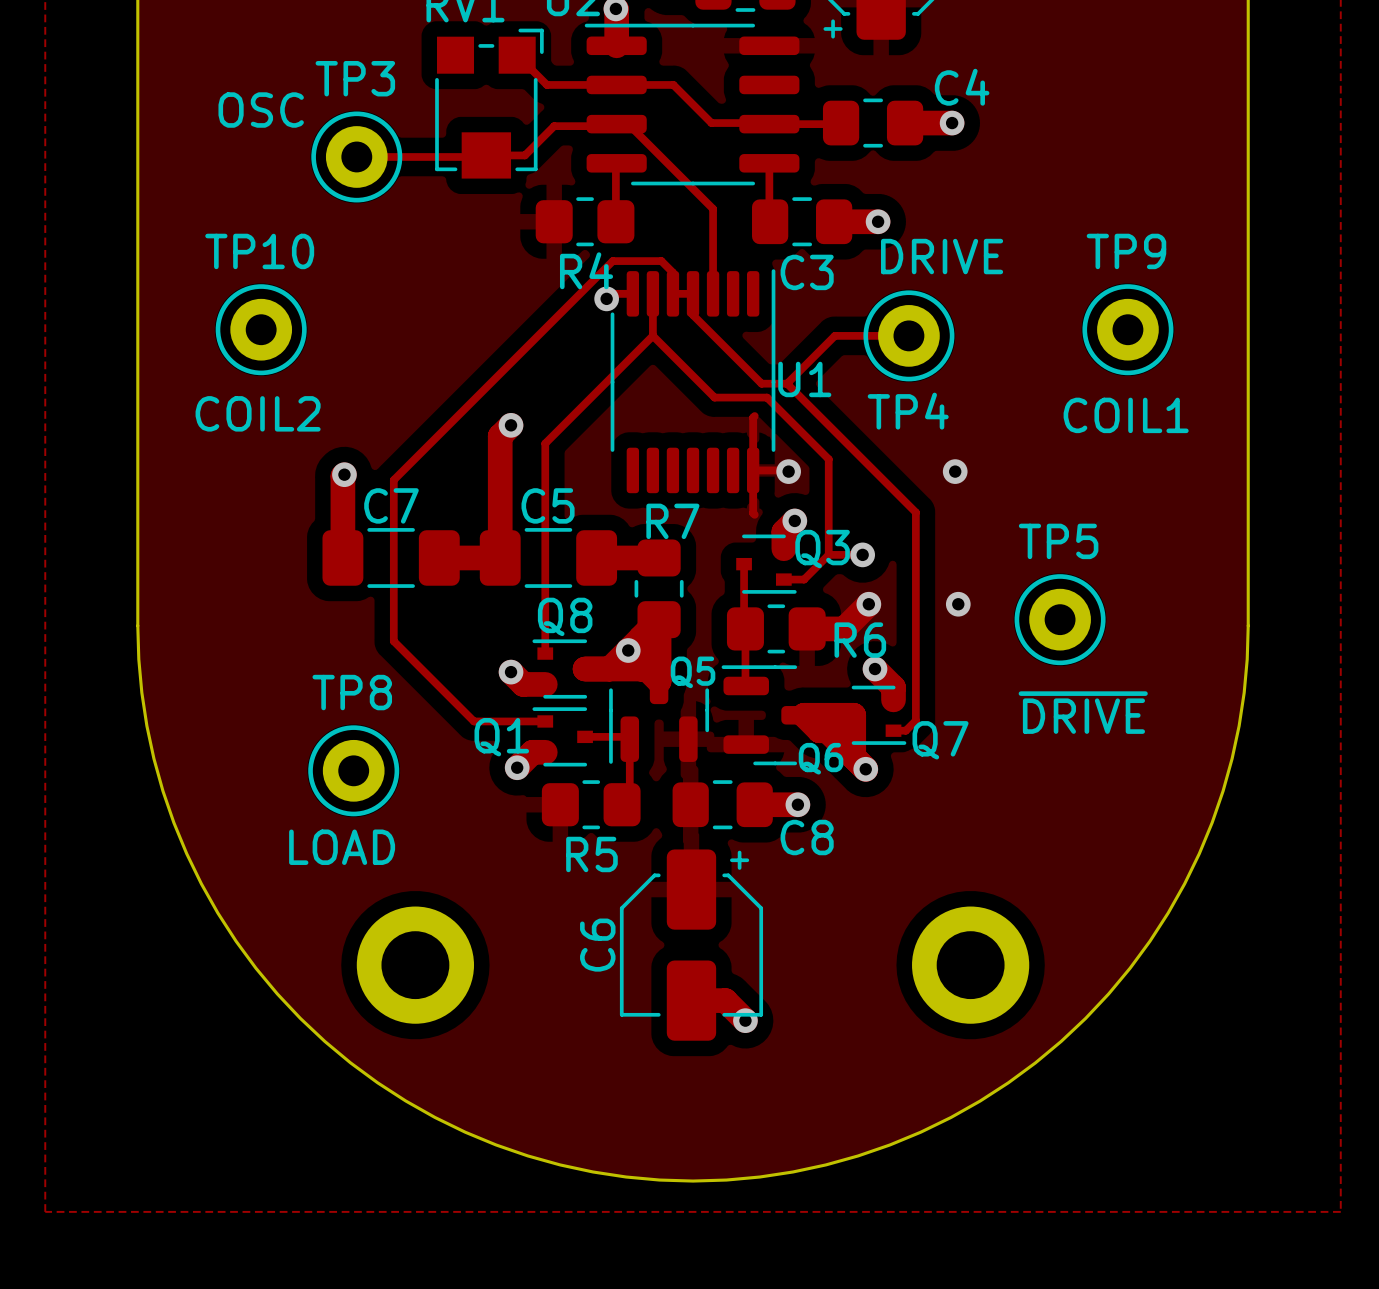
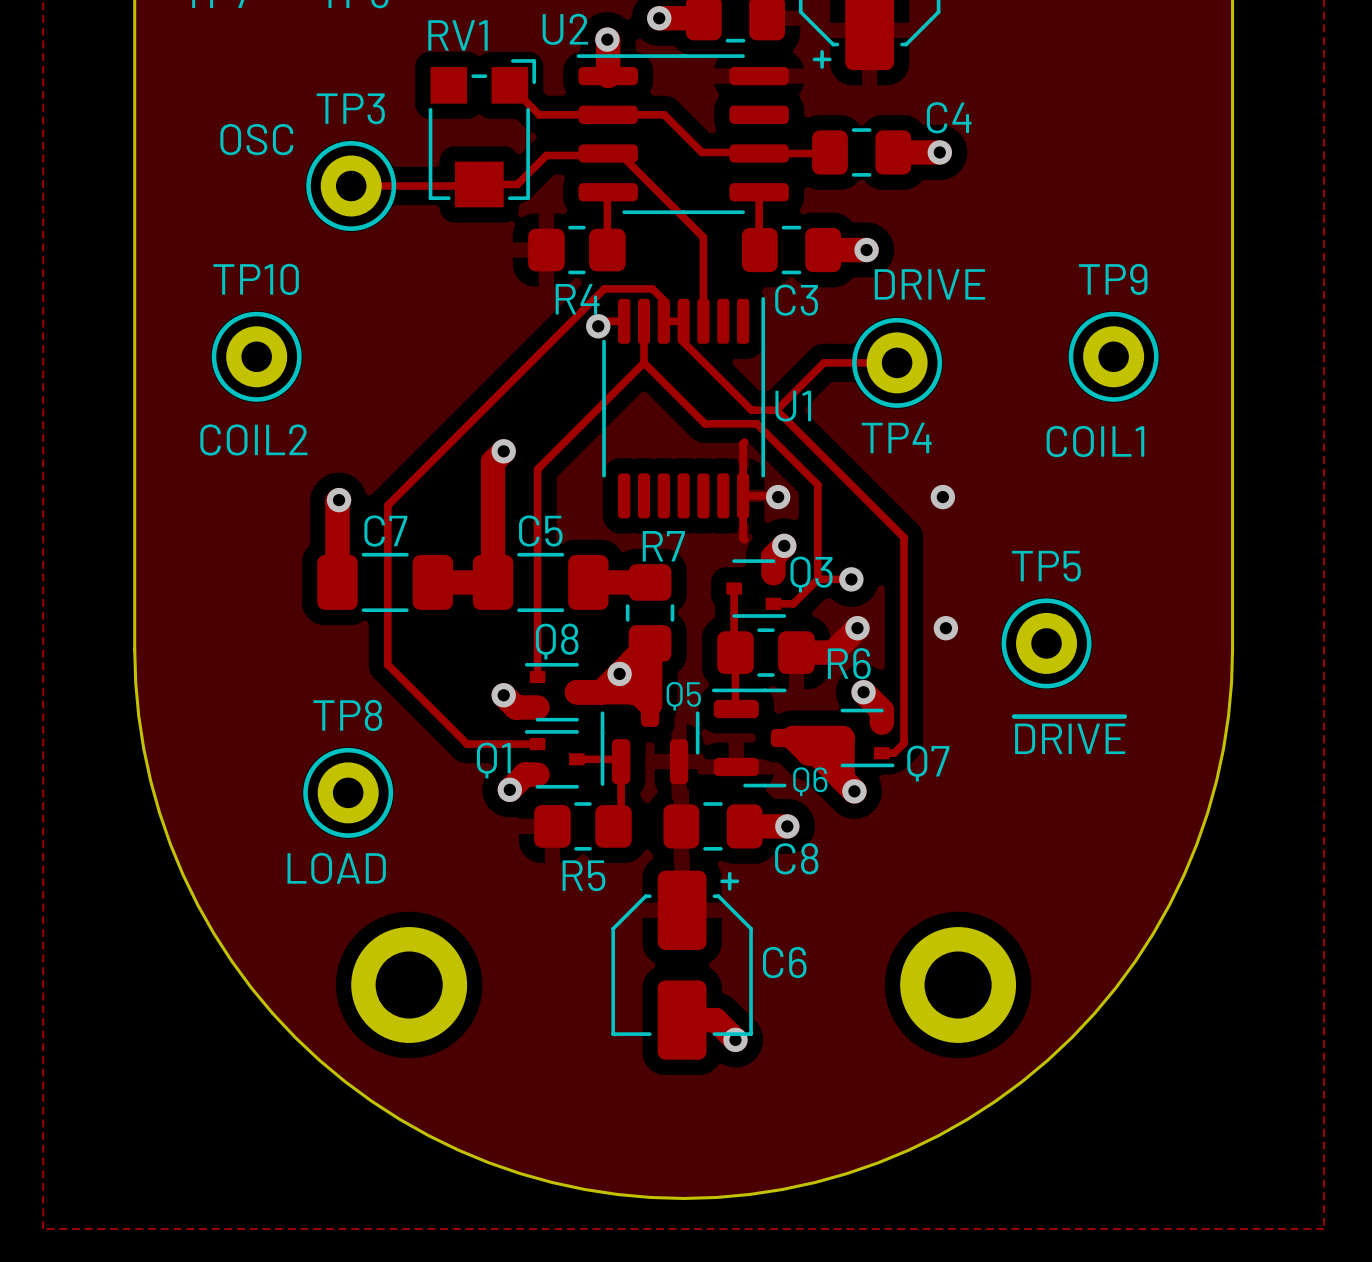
C6 name rotation: 0° (597, 945) -> 90° clockwise (784, 962)
C6 name position: C6 (597, 945) -> C6 (784, 962)

